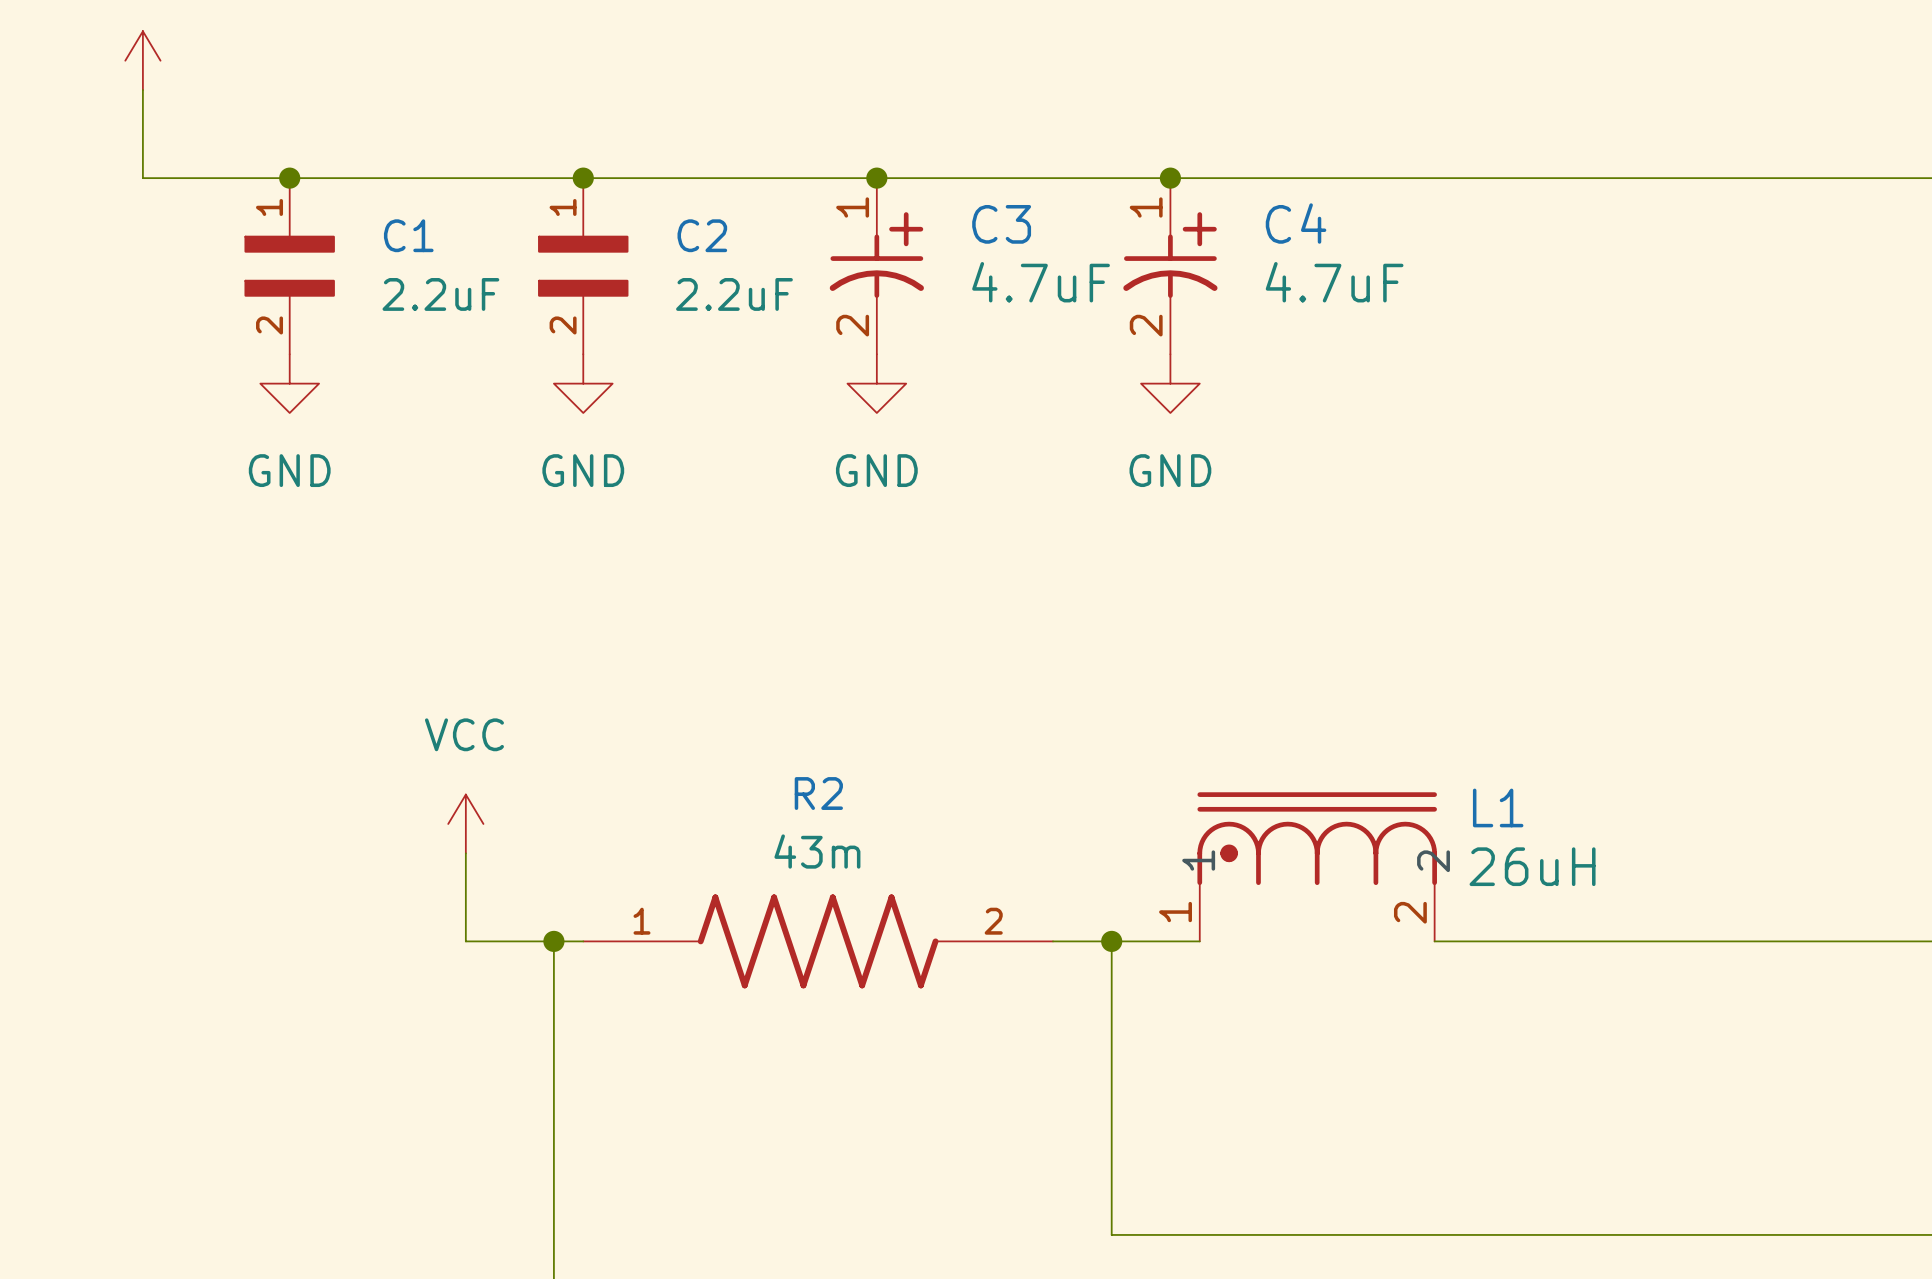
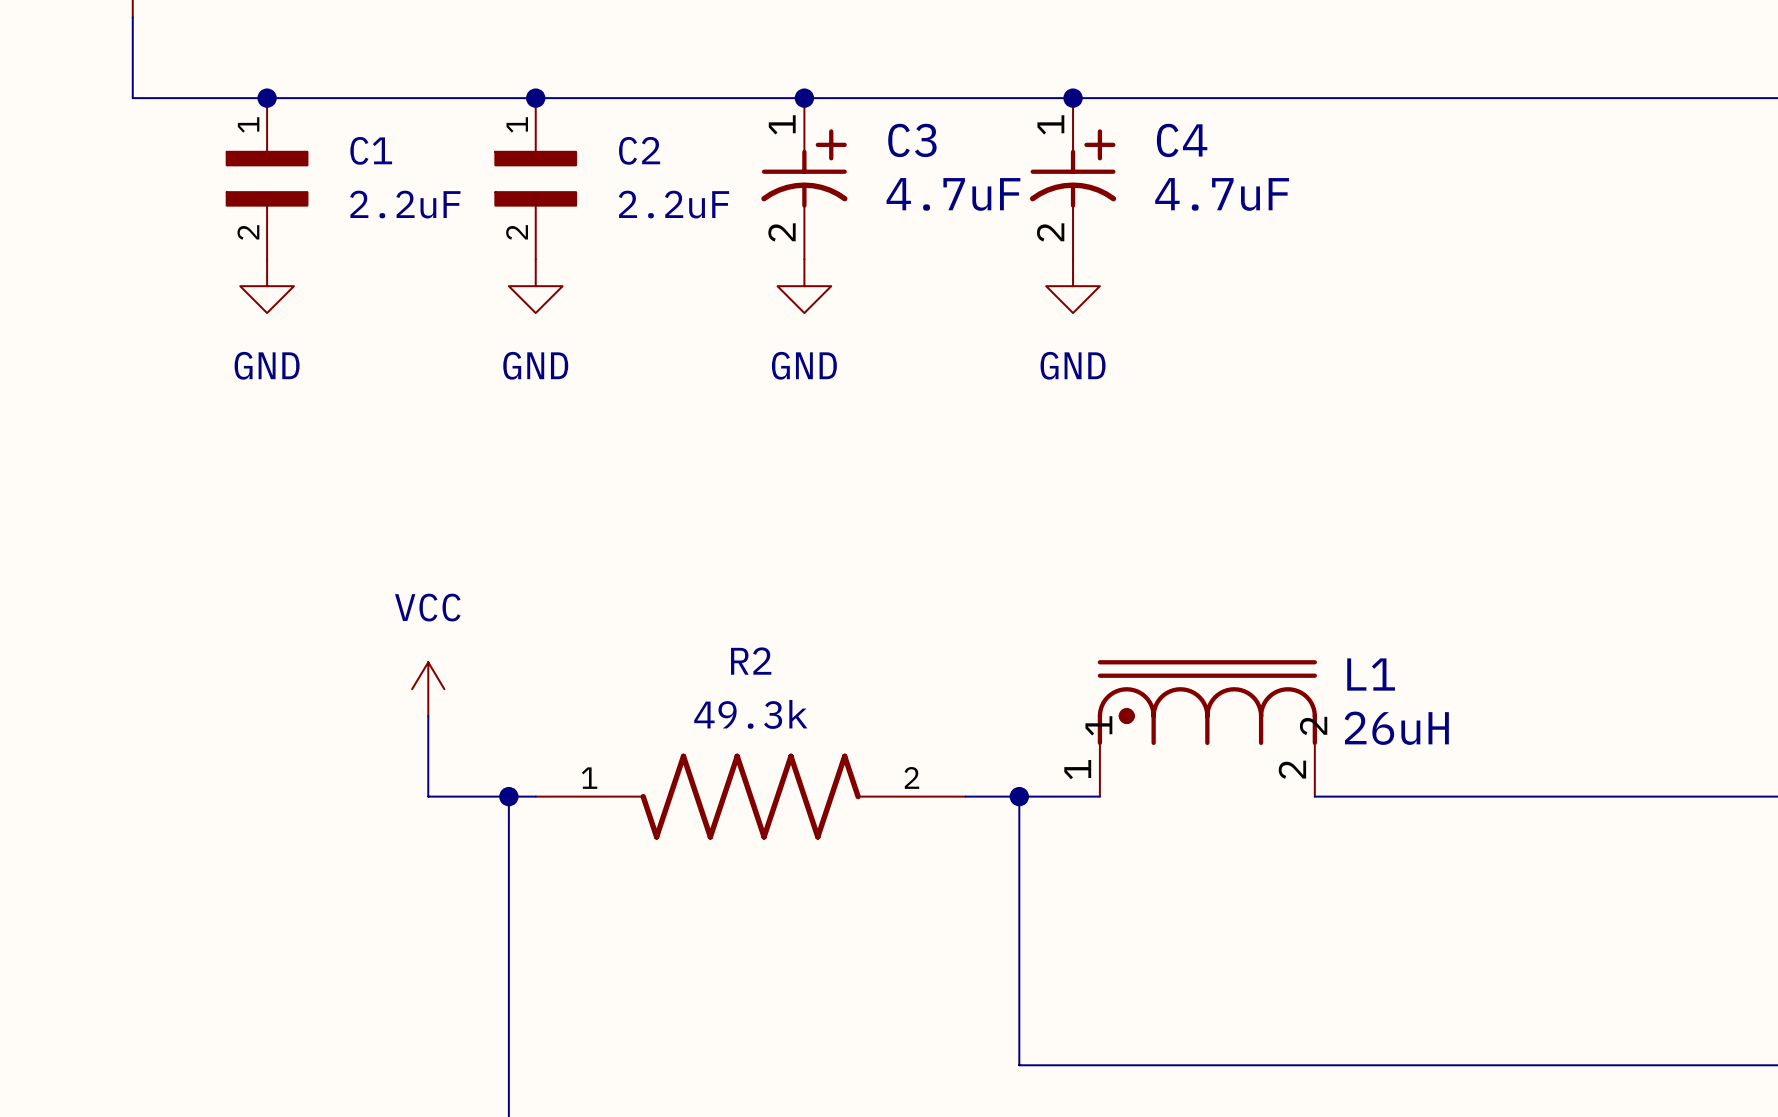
R2 value: 43m (817, 851) -> 49.3k (750, 714)
R2 flip: as is (818, 941) -> up-down (750, 796)

